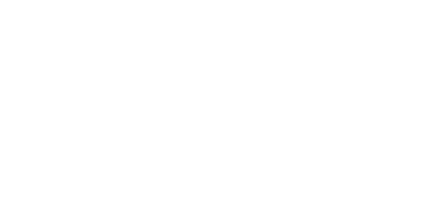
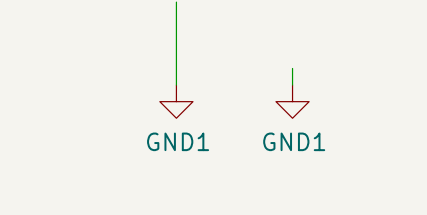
wire: none -> (176, 2) (176, 85)
wire: none -> (292, 68) (292, 85)
power symbol: none -> GND1 (176, 101)
power symbol: none -> GND1 (292, 101)

